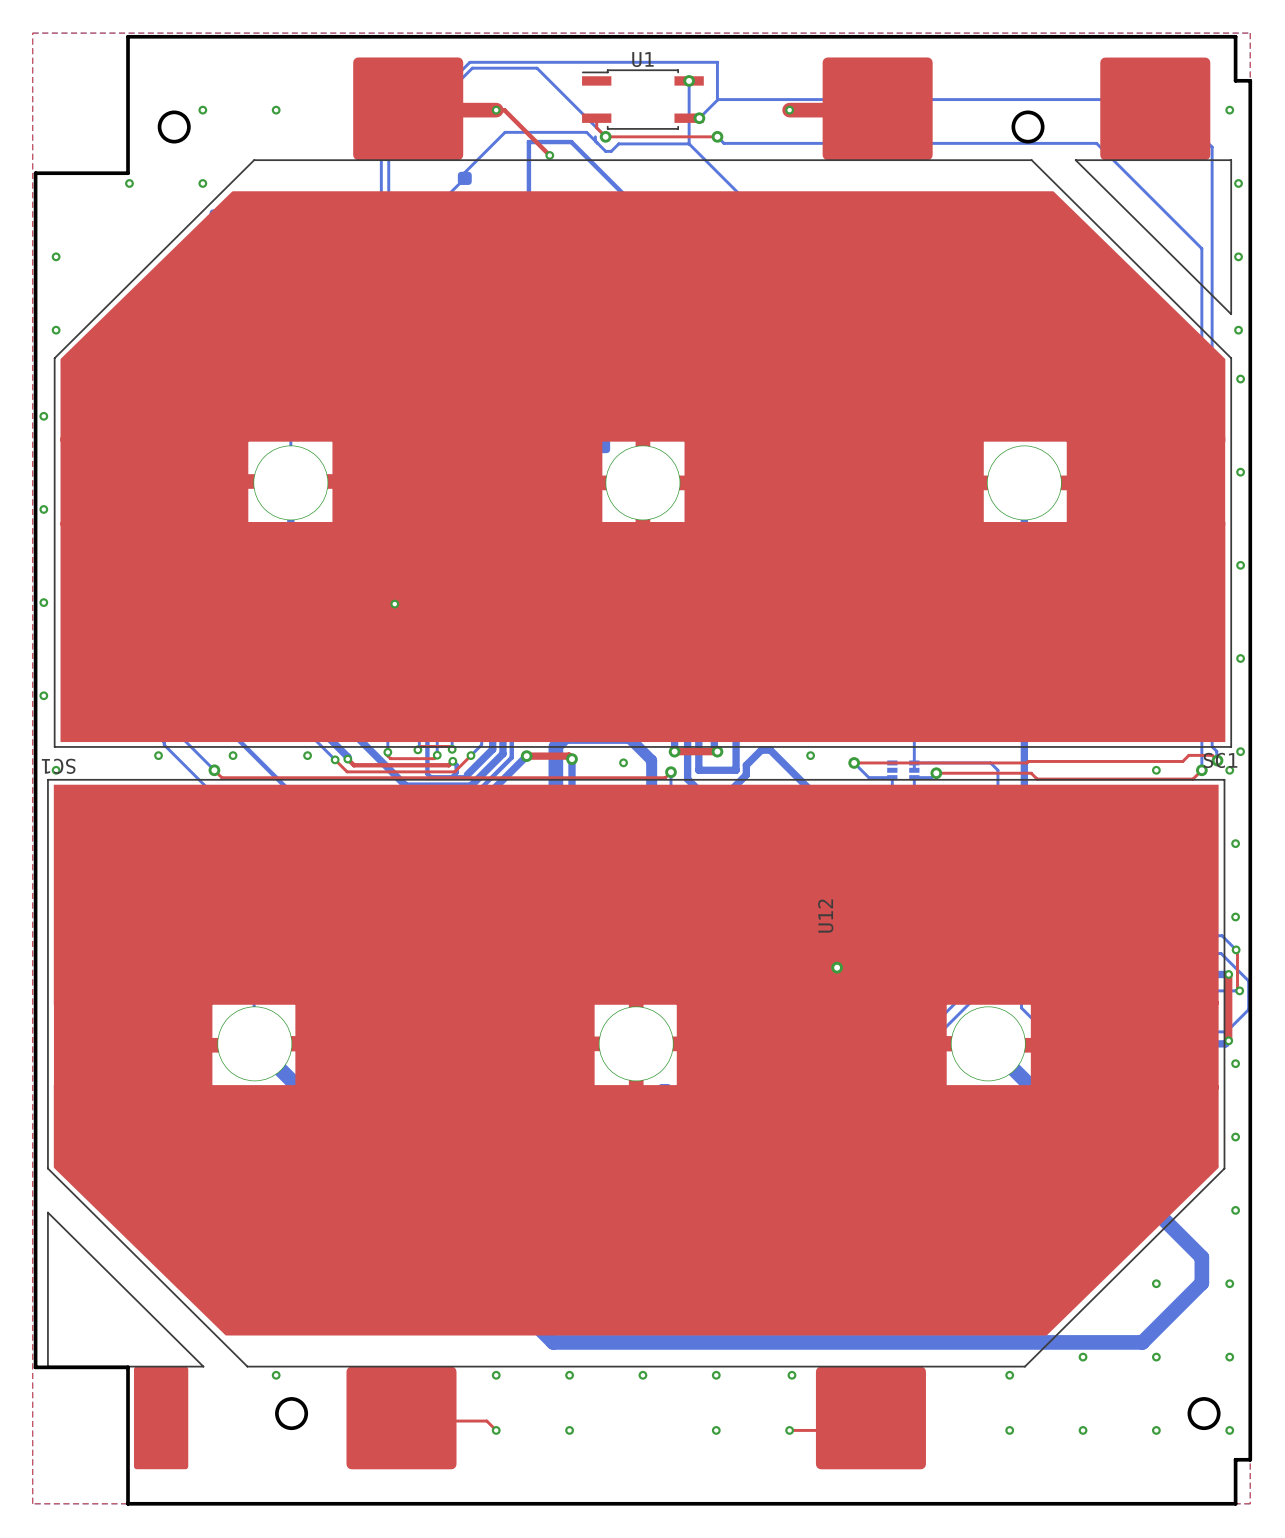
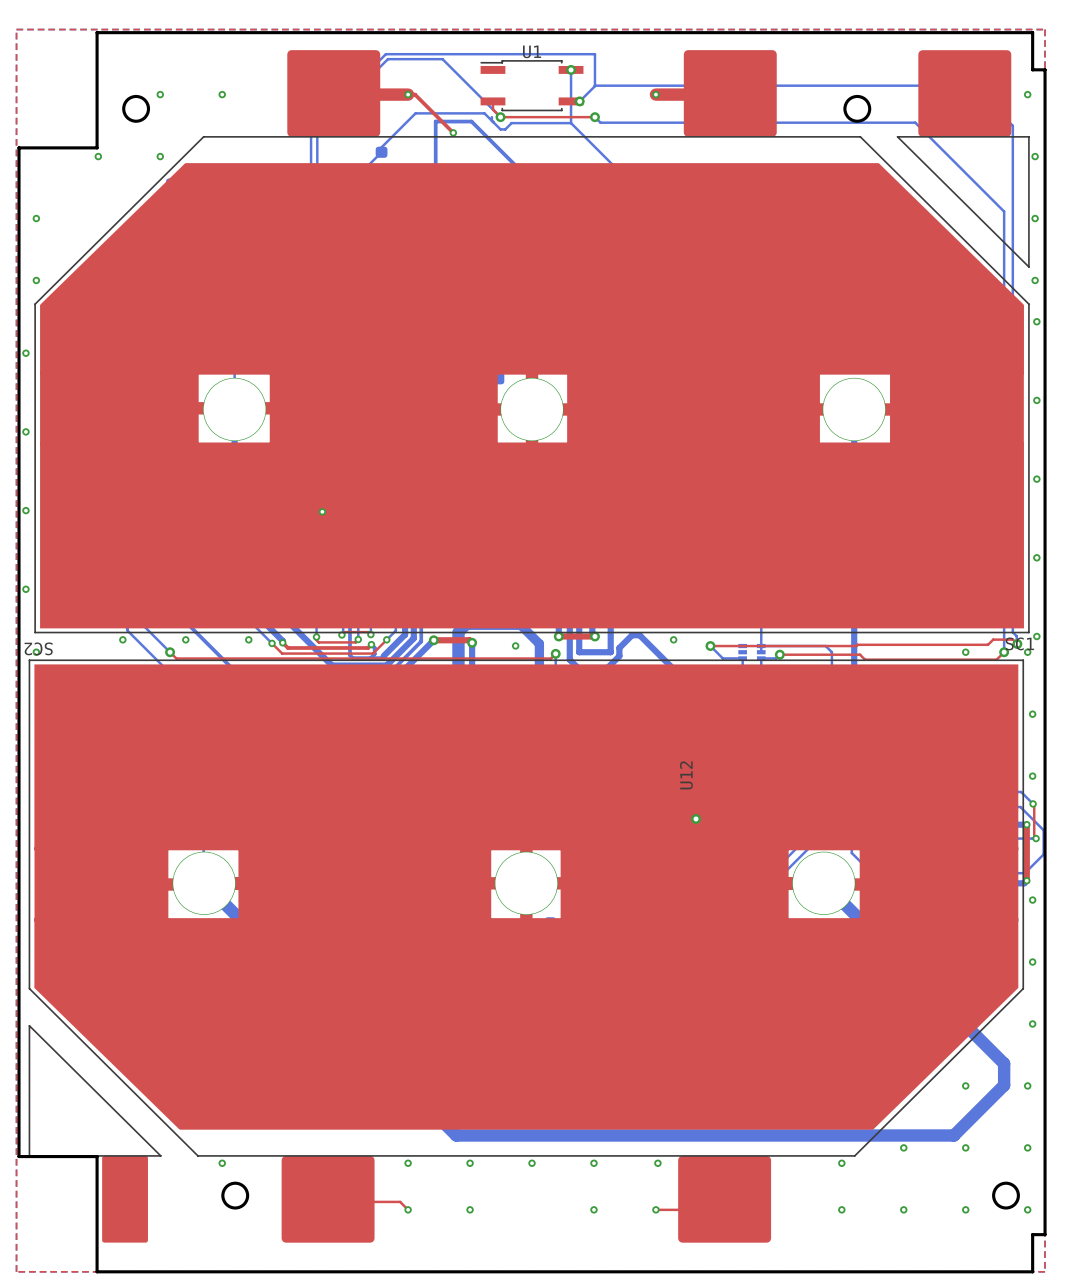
SC1 name: SC1 (58, 766) -> SC2 (38, 648)

